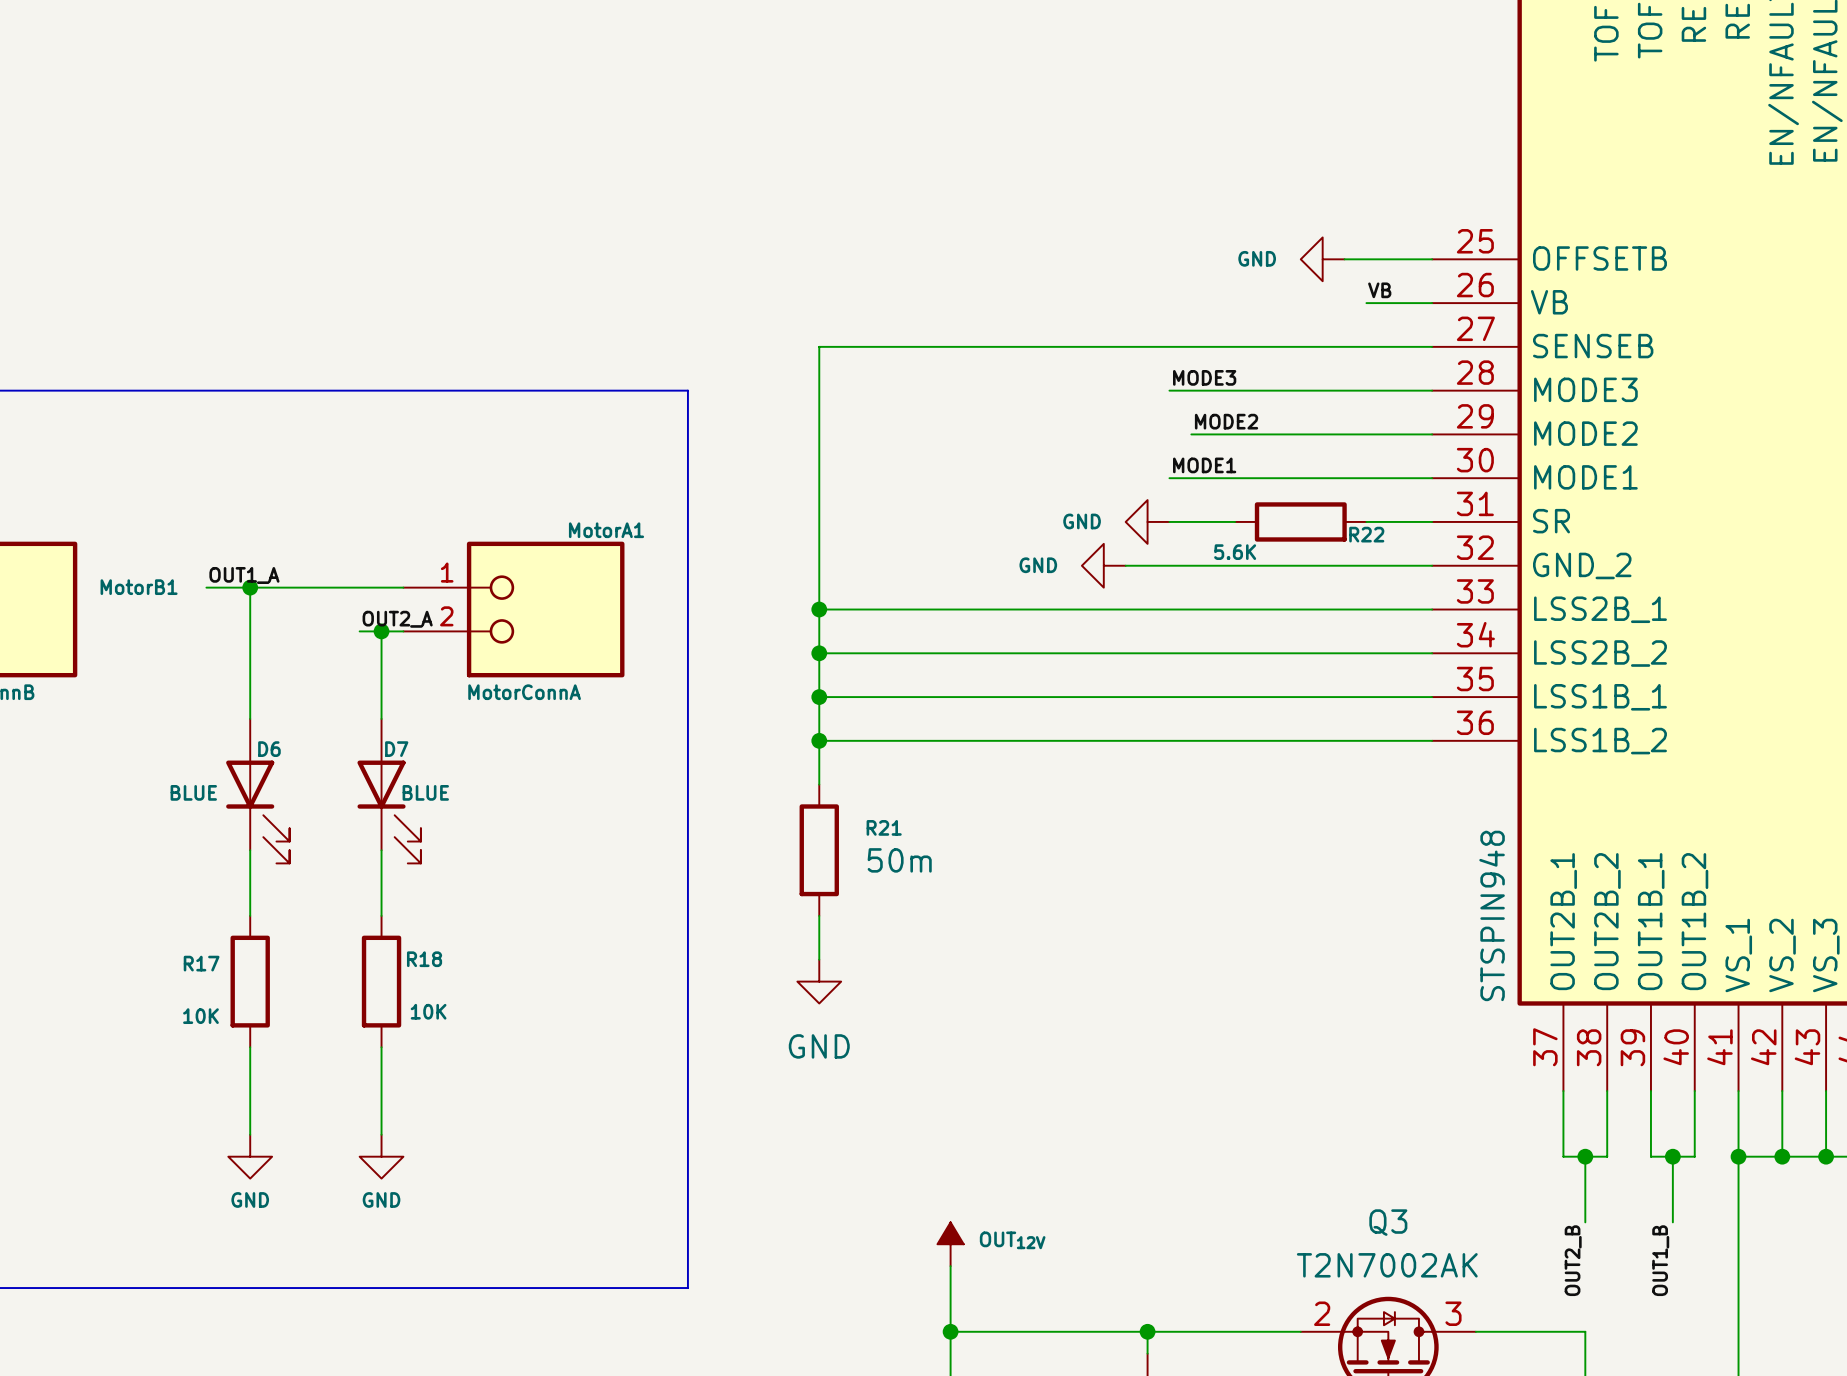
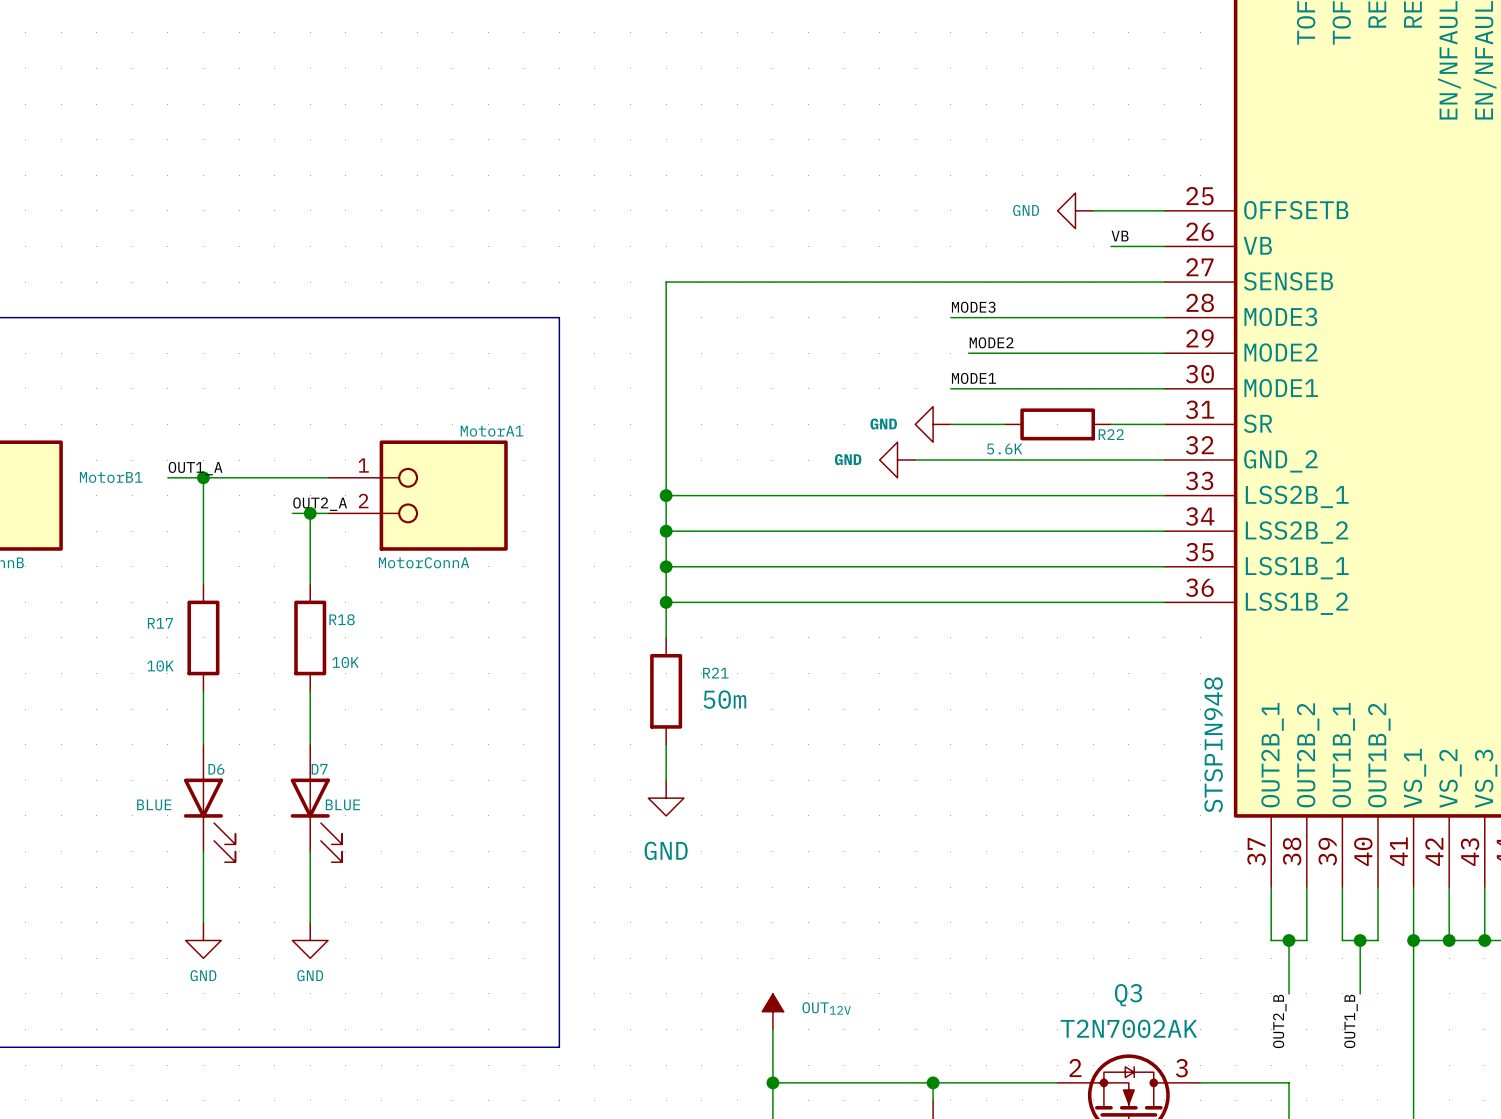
D6 position: (257, 791) -> (209, 803)
D7 position: (389, 791) -> (316, 803)
R17 position: (250, 981) -> (203, 637)
R18 position: (381, 981) -> (310, 637)

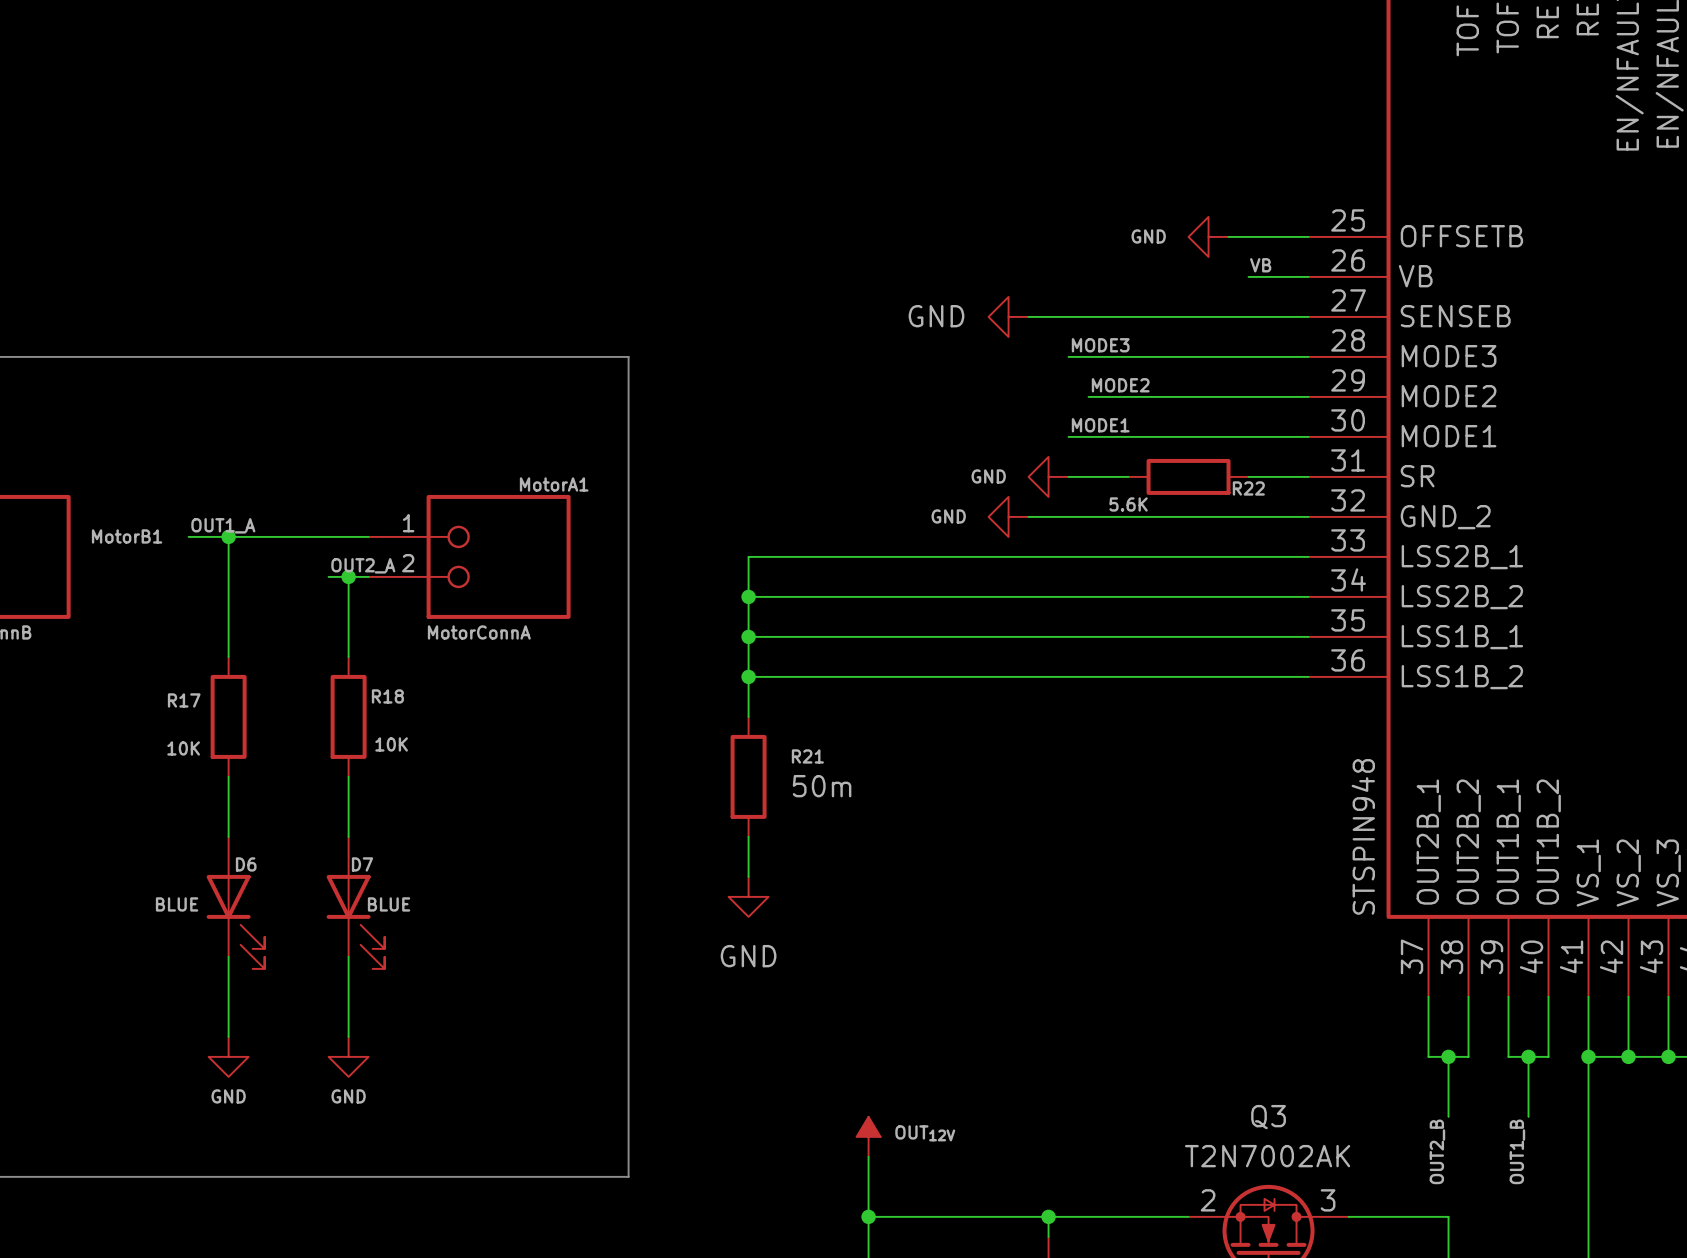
power symbol: none -> GND (1008, 316)
wire: (915, 282) (666, 282) (666, 495) -> none
junction: (666, 495) -> none

